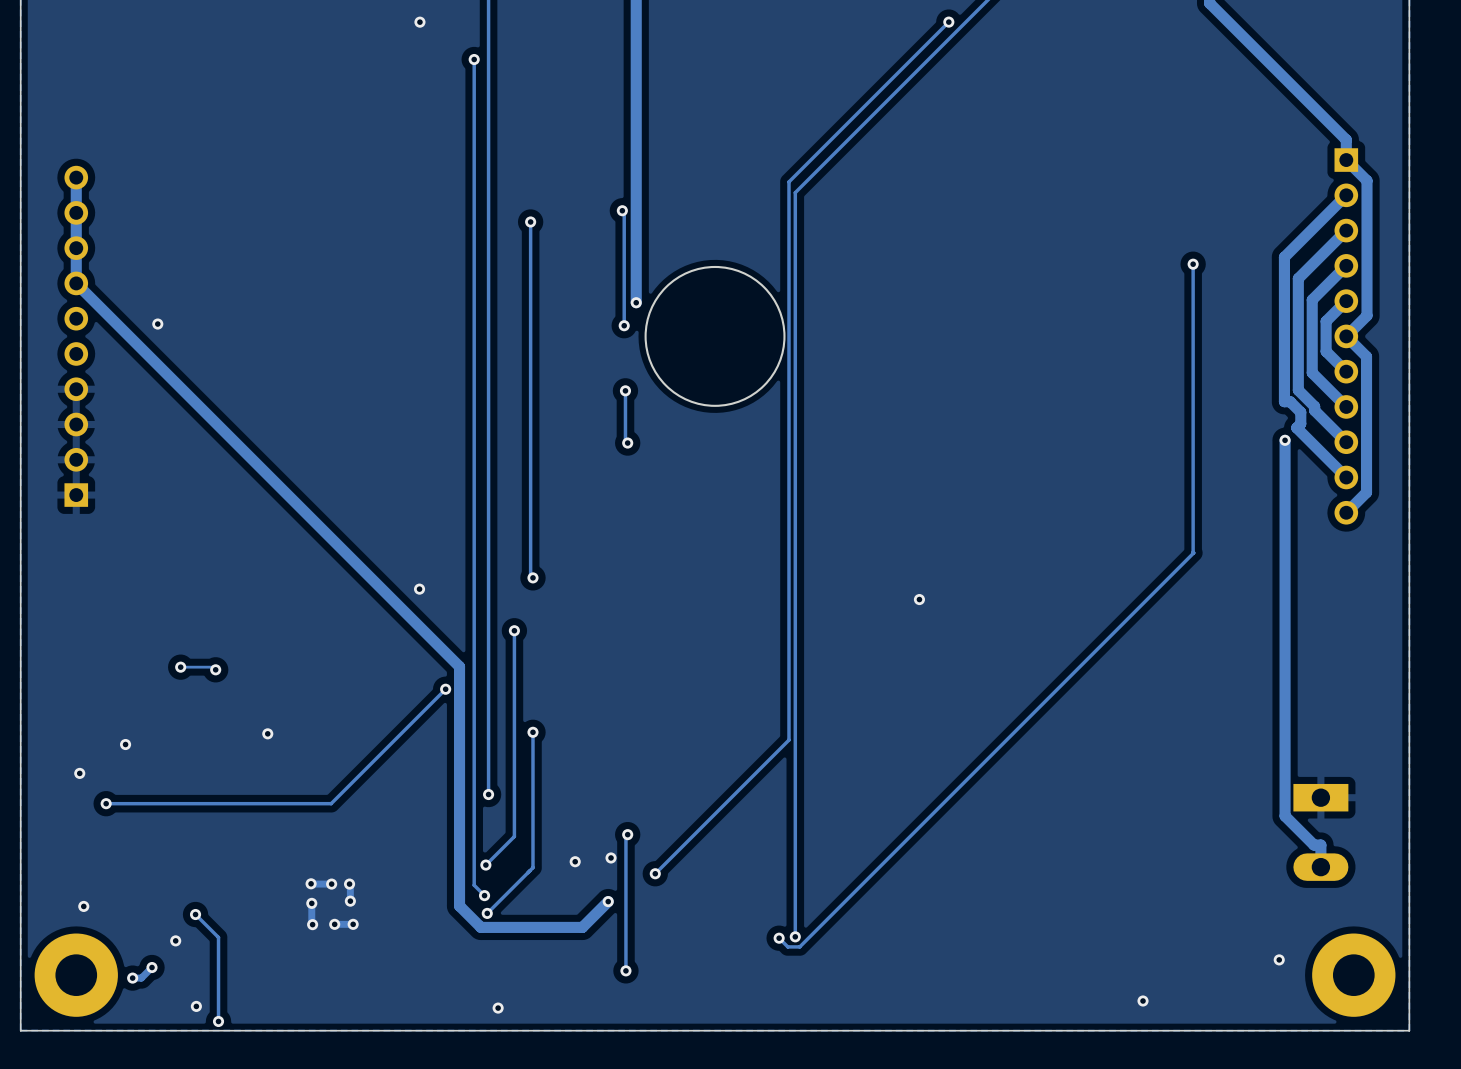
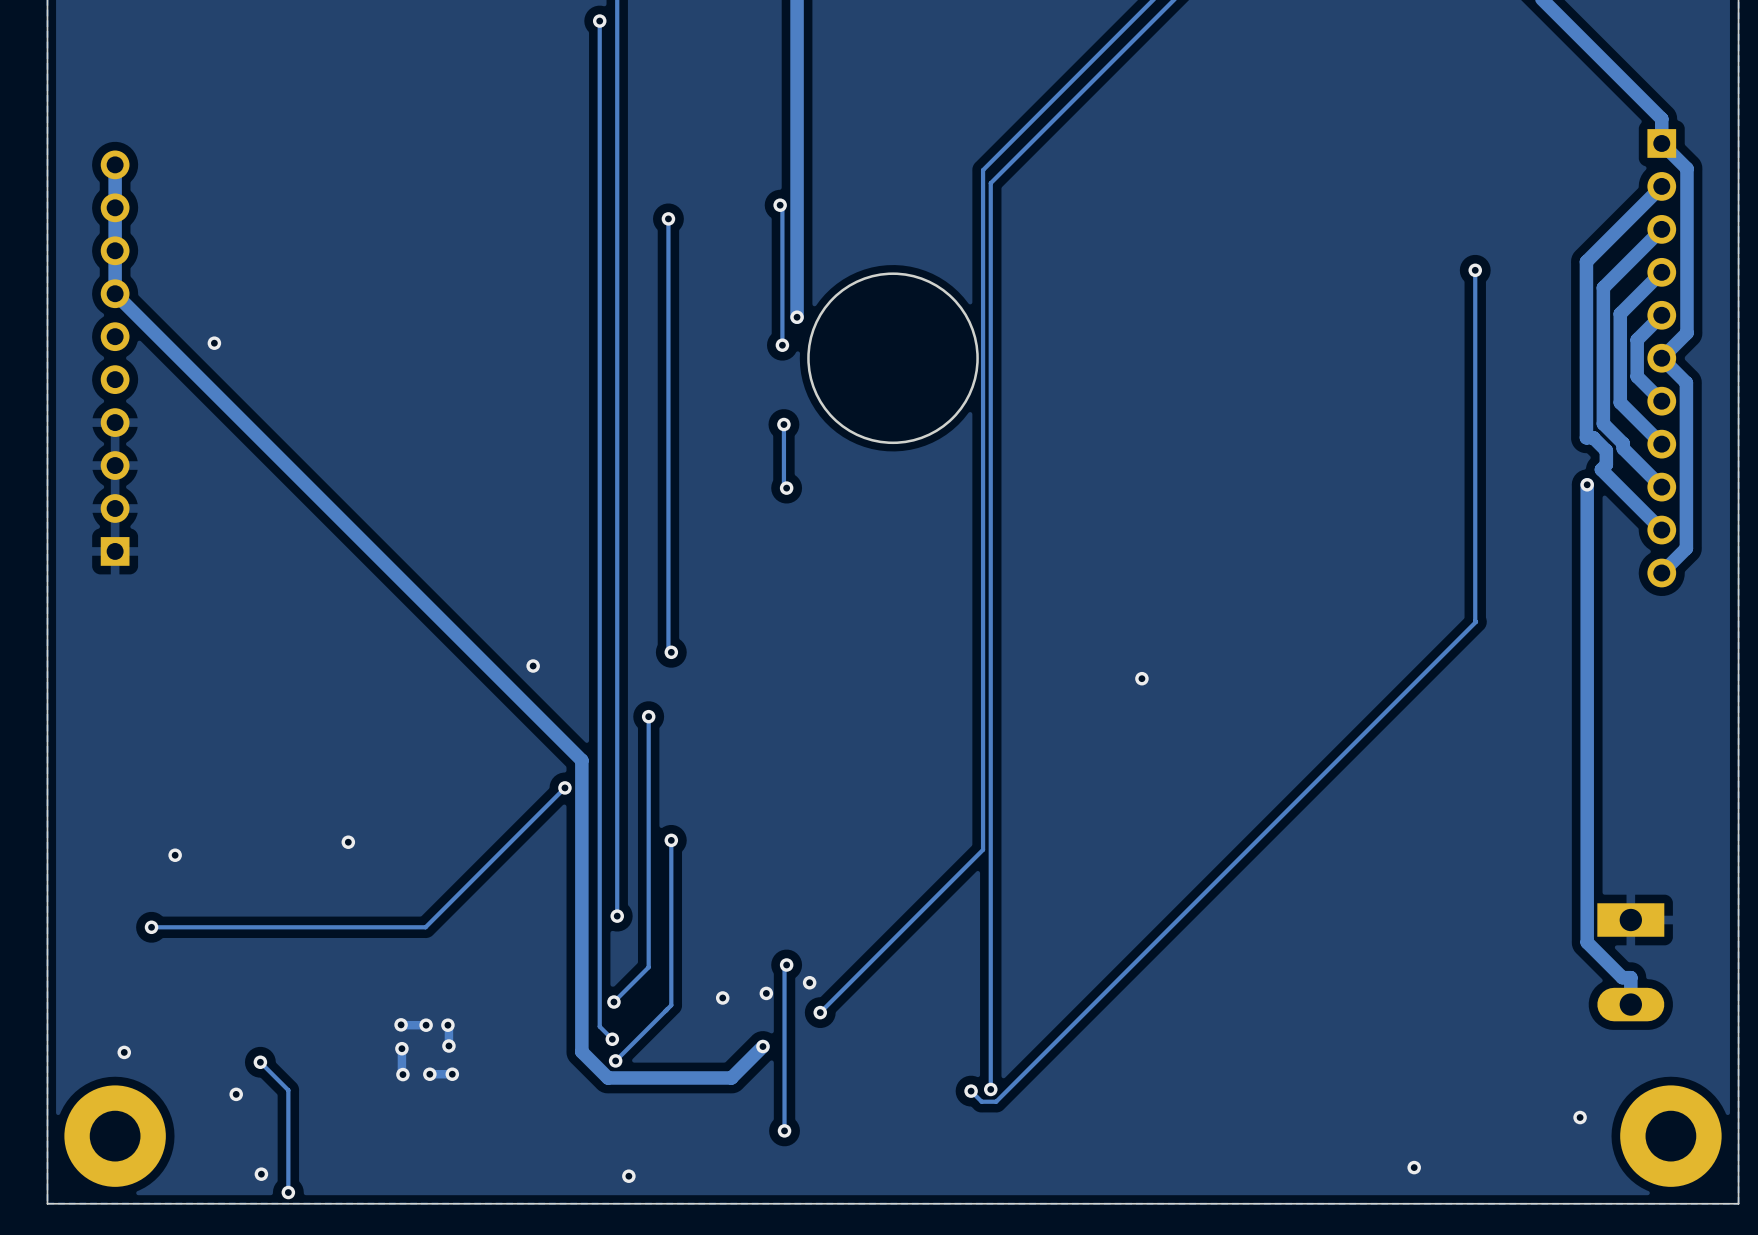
track: (180, 667) (213, 667) (215, 669) -> none
via: (180, 667) -> none
via: (215, 669) -> none
via: (79, 773) -> none
via: none -> (809, 982)
track: (151, 967) (141, 978) (132, 978) -> none
via: (151, 967) -> none
via: (132, 978) -> none

